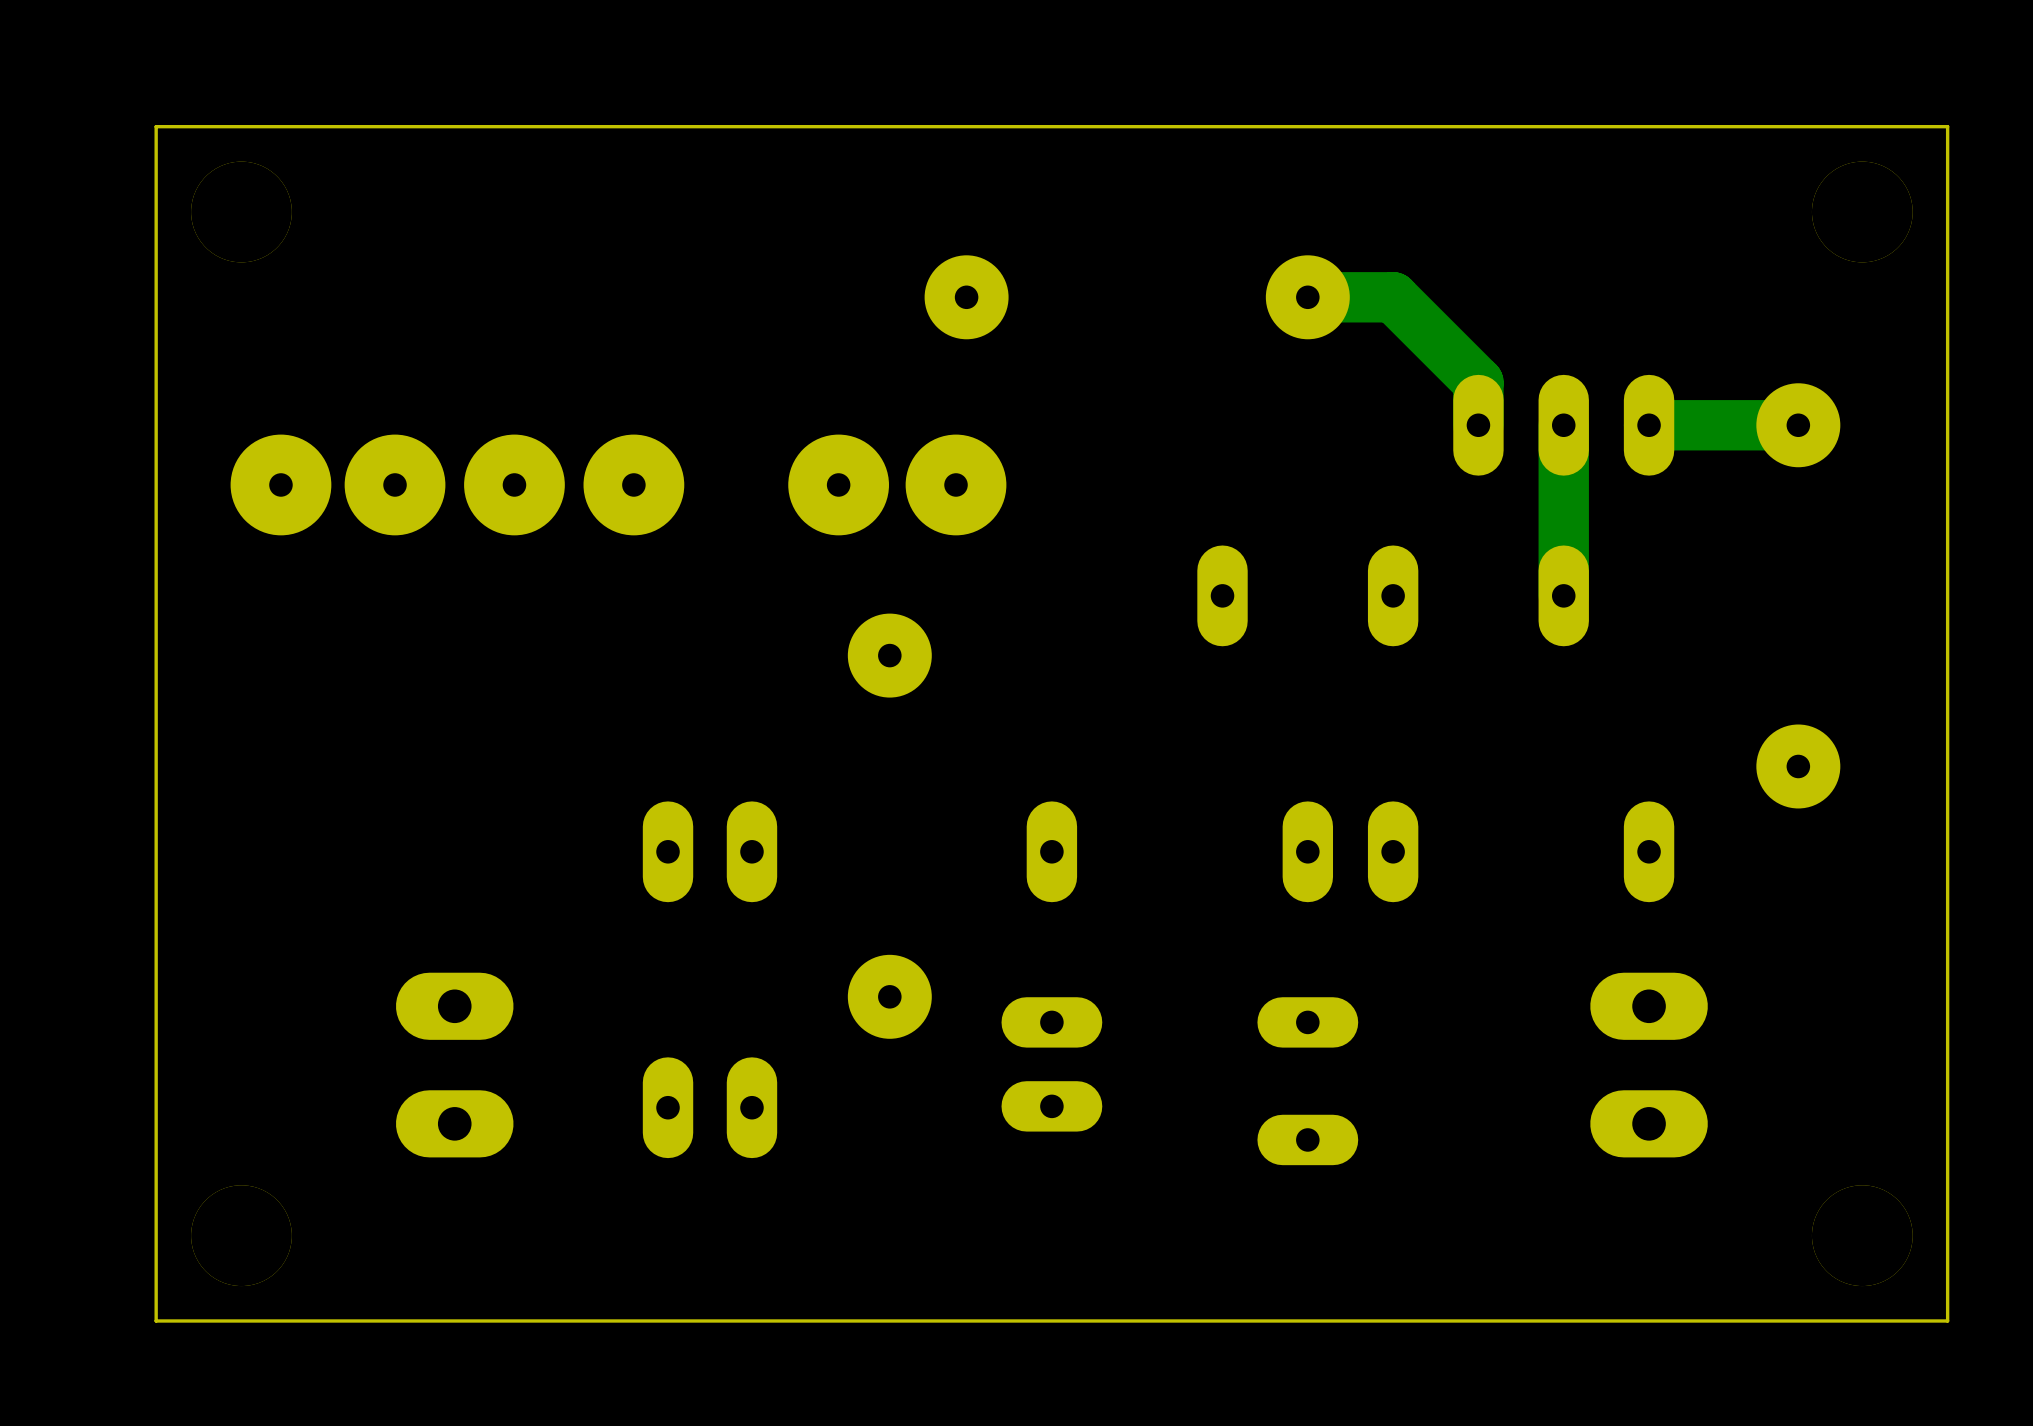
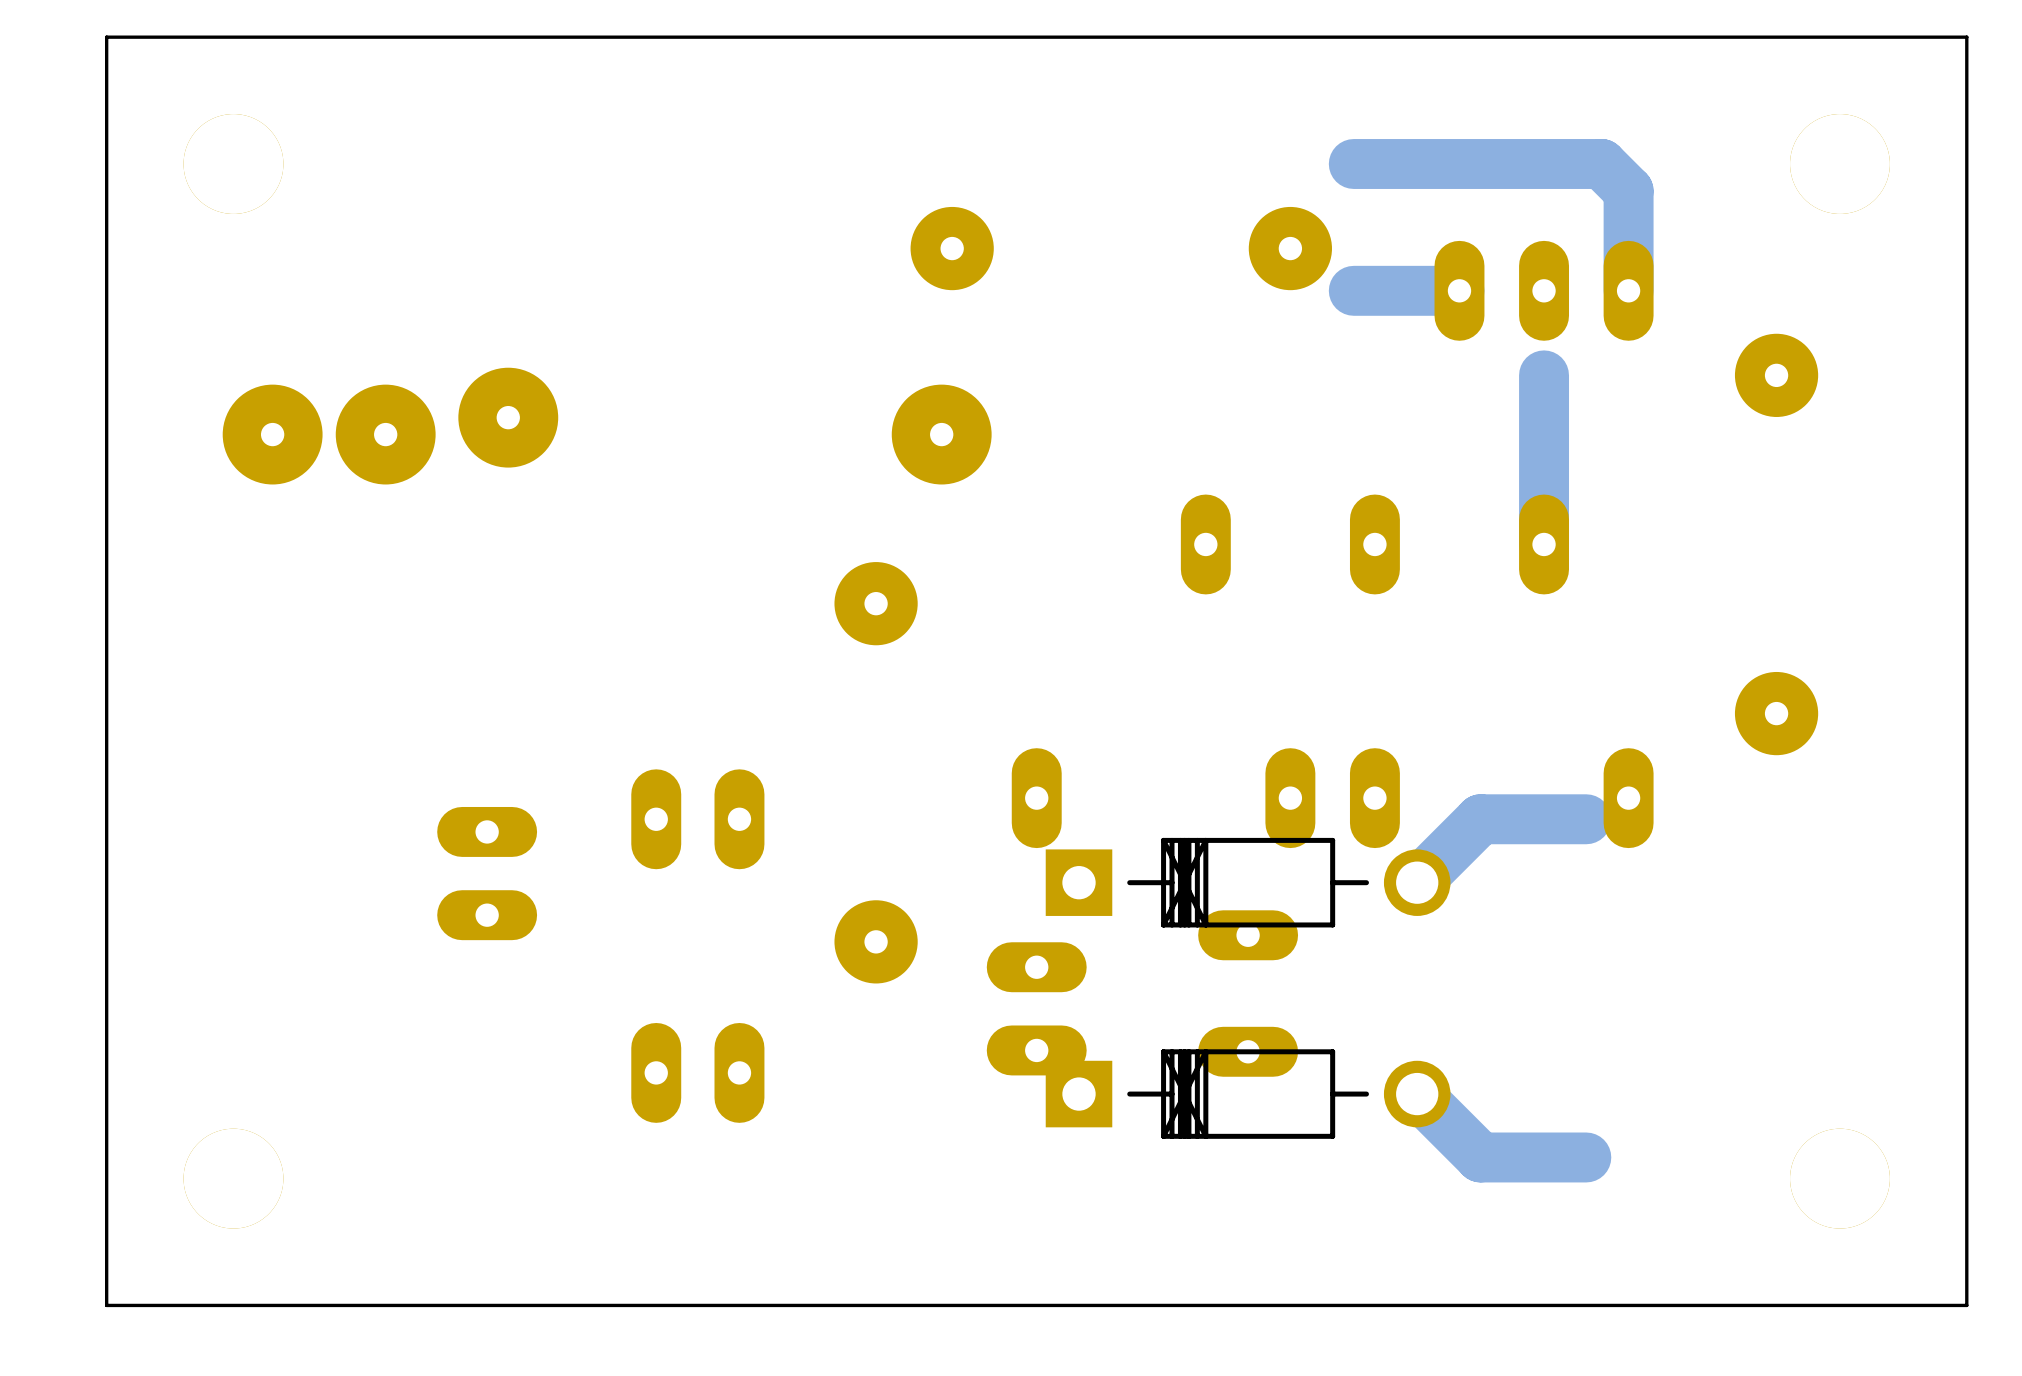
board edge: (1947, 126) (156, 126) (156, 1320) (1947, 1320) (1947, 126) -> (1966, 37) (1966, 1305) (106, 1305) (106, 37) (1966, 37)
bottom track: none -> (1353, 163) (1601, 163) (1628, 190) (1628, 290)
bottom track: (1307, 297) (1393, 297) (1478, 382) (1478, 425) -> none
bottom track: none -> (1459, 290) (1353, 290)
part position: (1563, 425) -> (1544, 290)
bottom track: (1798, 425) (1649, 425) -> none
part position: (514, 484) -> (508, 417)
part: (633, 484) -> none
part: (838, 484) -> none
part position: (709, 851) -> (697, 819)
bottom track: none -> (1586, 819) (1480, 819) (1417, 882)
part: none -> (487, 873)
part: none -> (1248, 882)
part: (454, 1065) -> none
part: (1649, 1065) -> none
part position: (1307, 1081) -> (1248, 993)
part position: (709, 1107) -> (697, 1072)
part: none -> (1248, 1094)
bottom track: none -> (1417, 1094) (1480, 1157) (1586, 1157)

